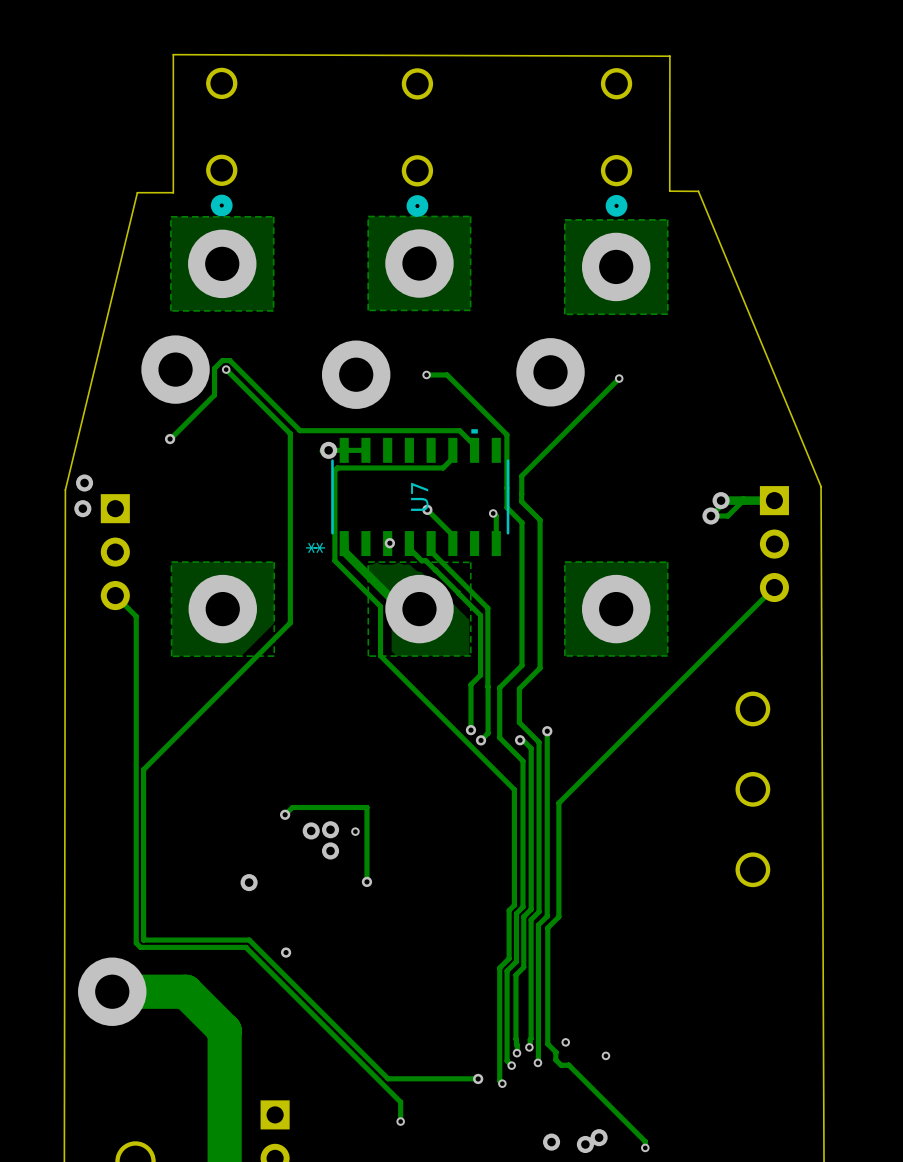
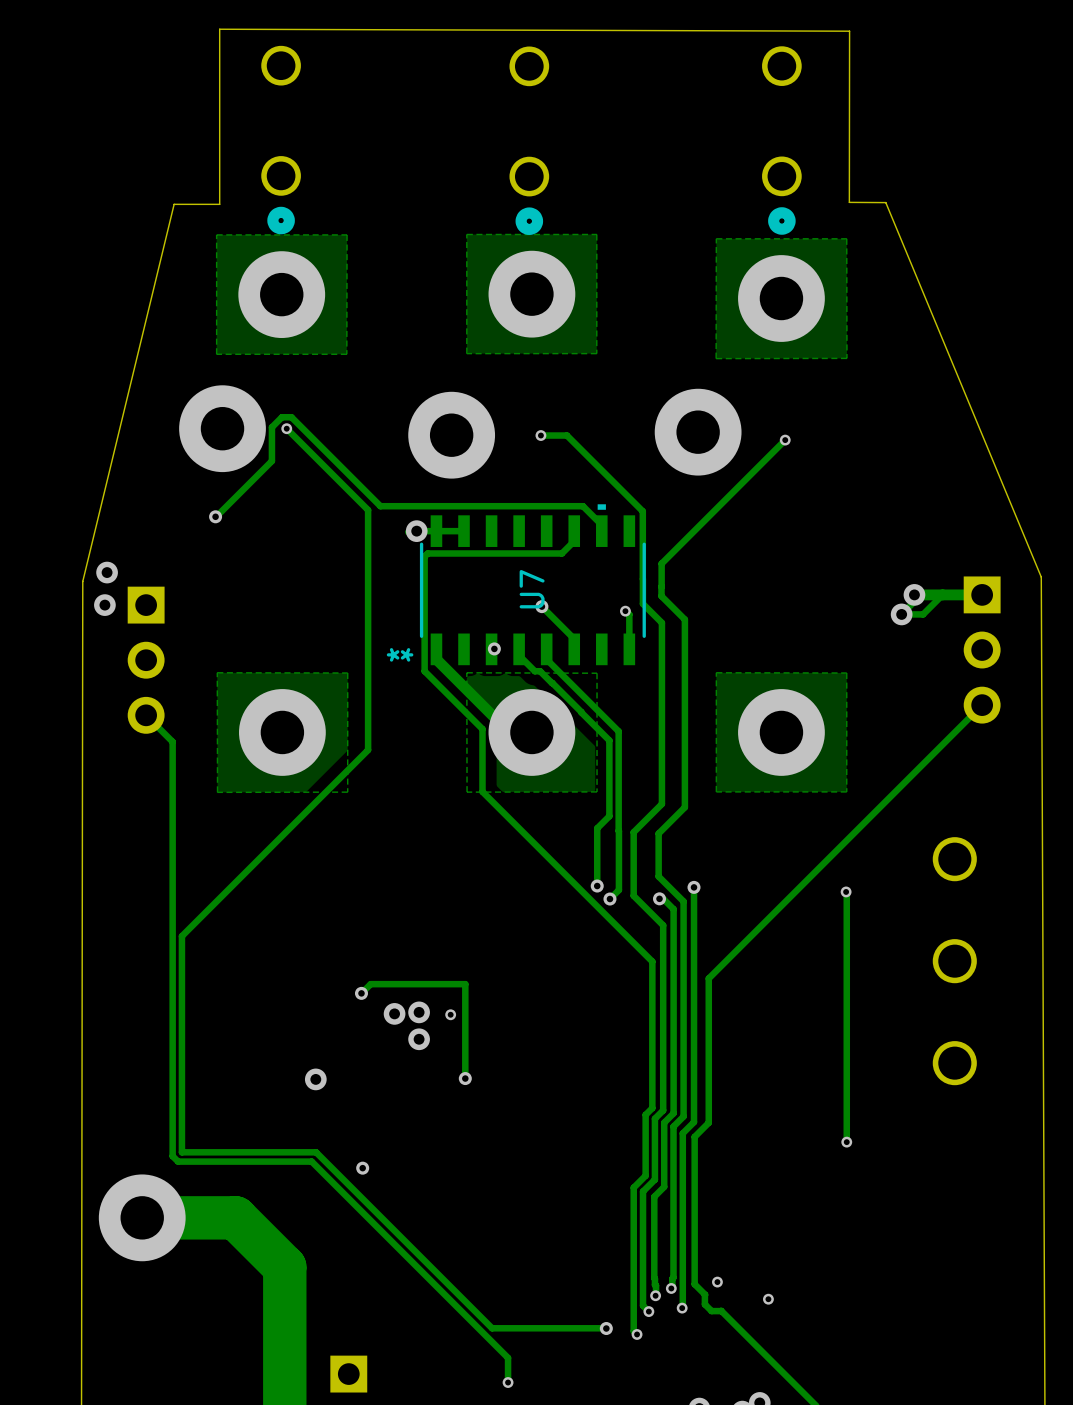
track: none -> (846, 891) (846, 1142)
via: none -> (846, 891)
via: none -> (846, 1142)

